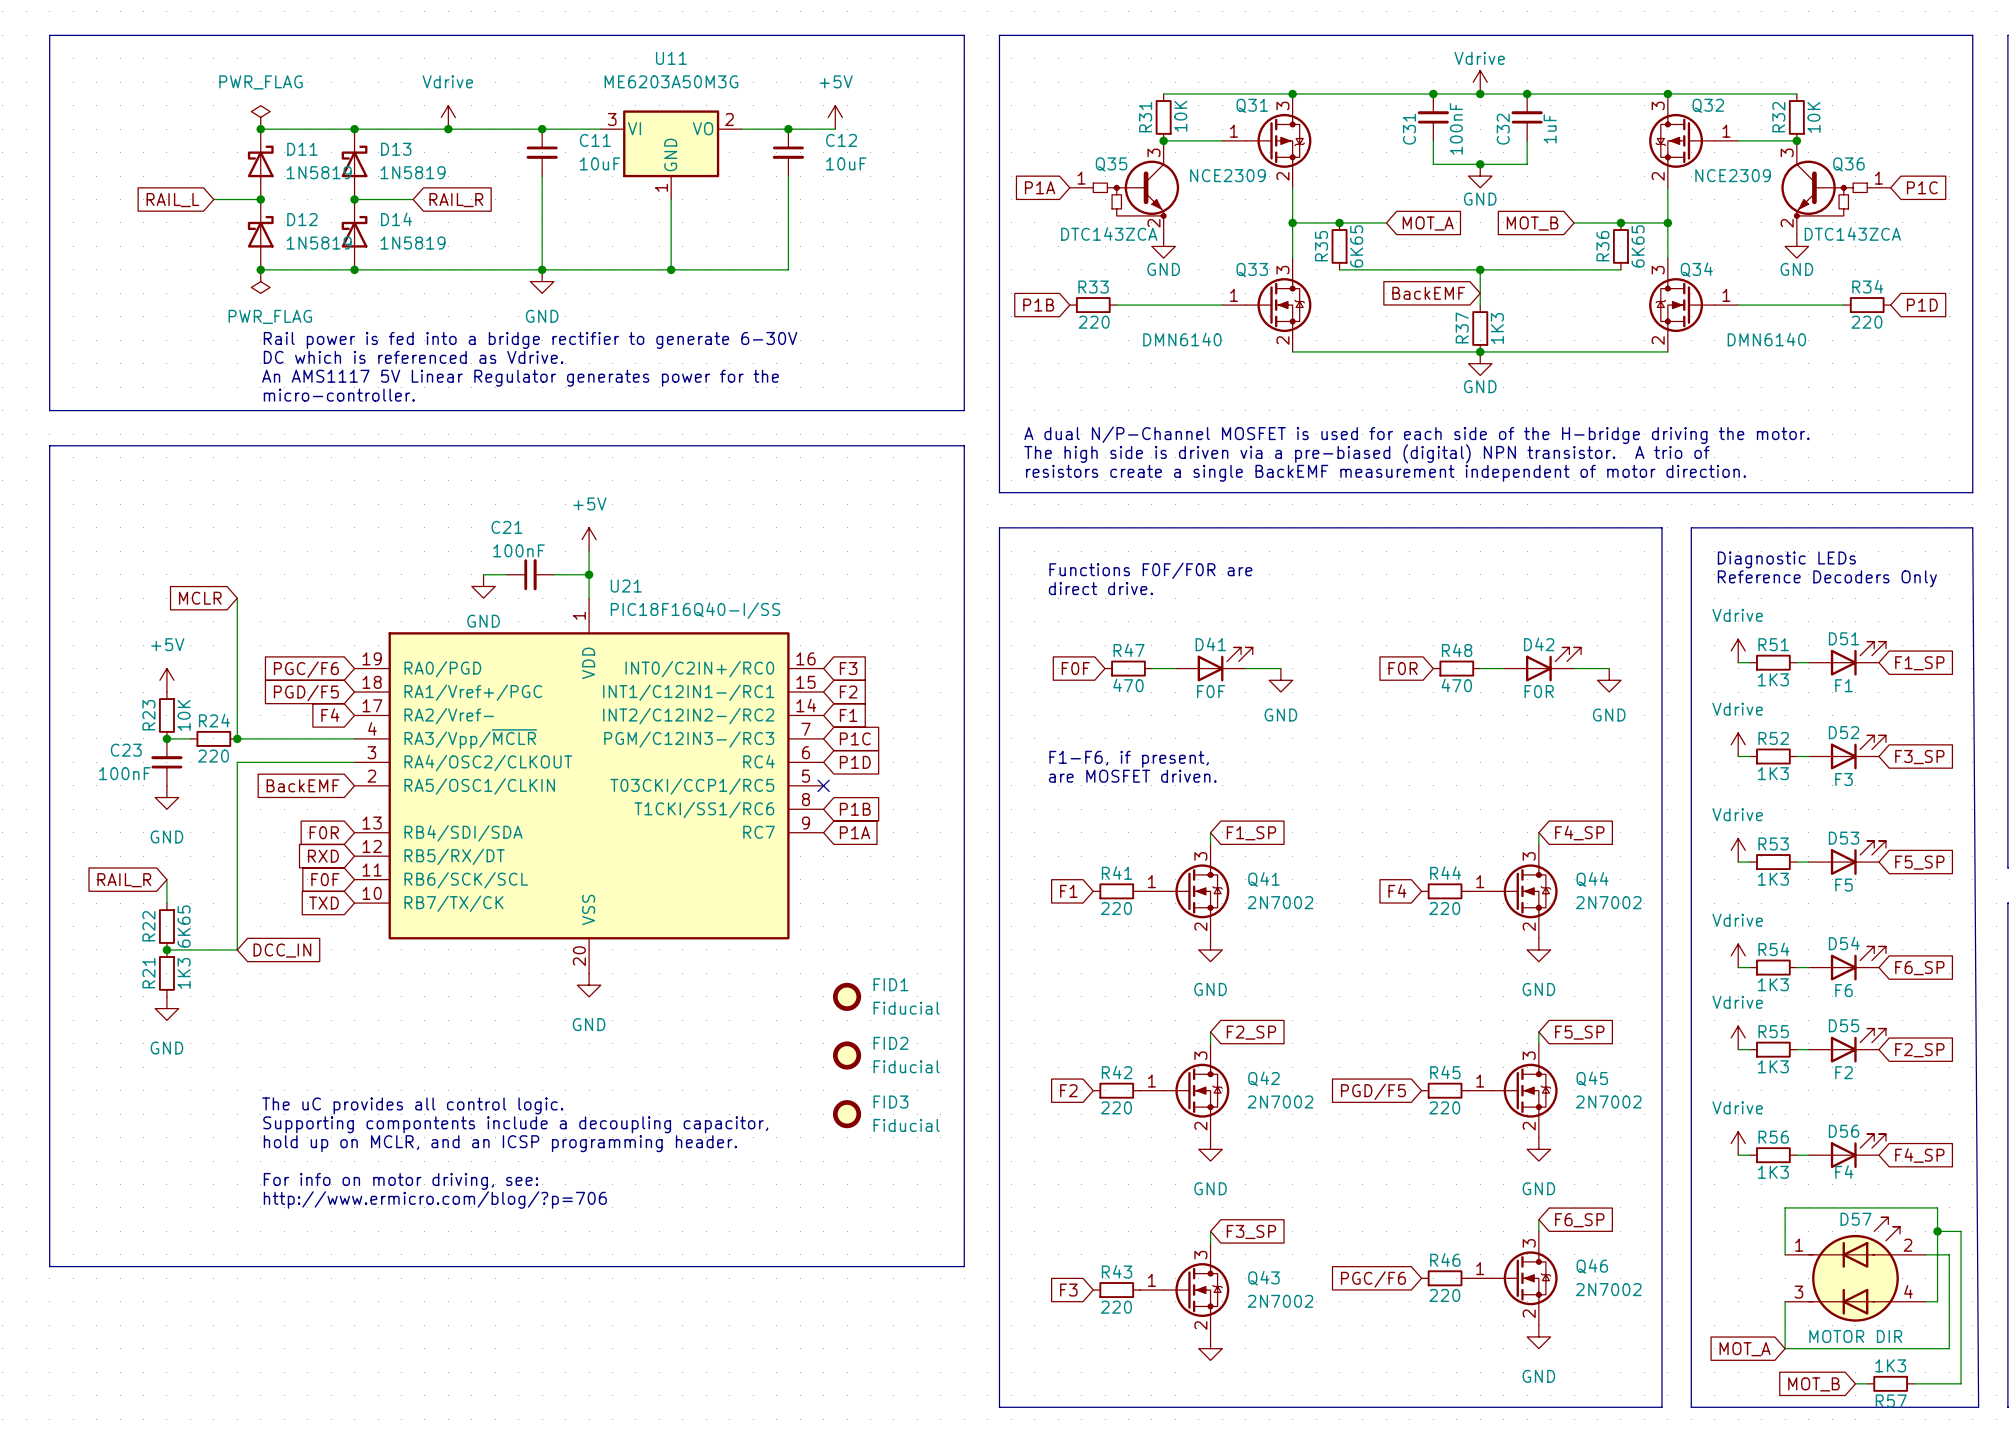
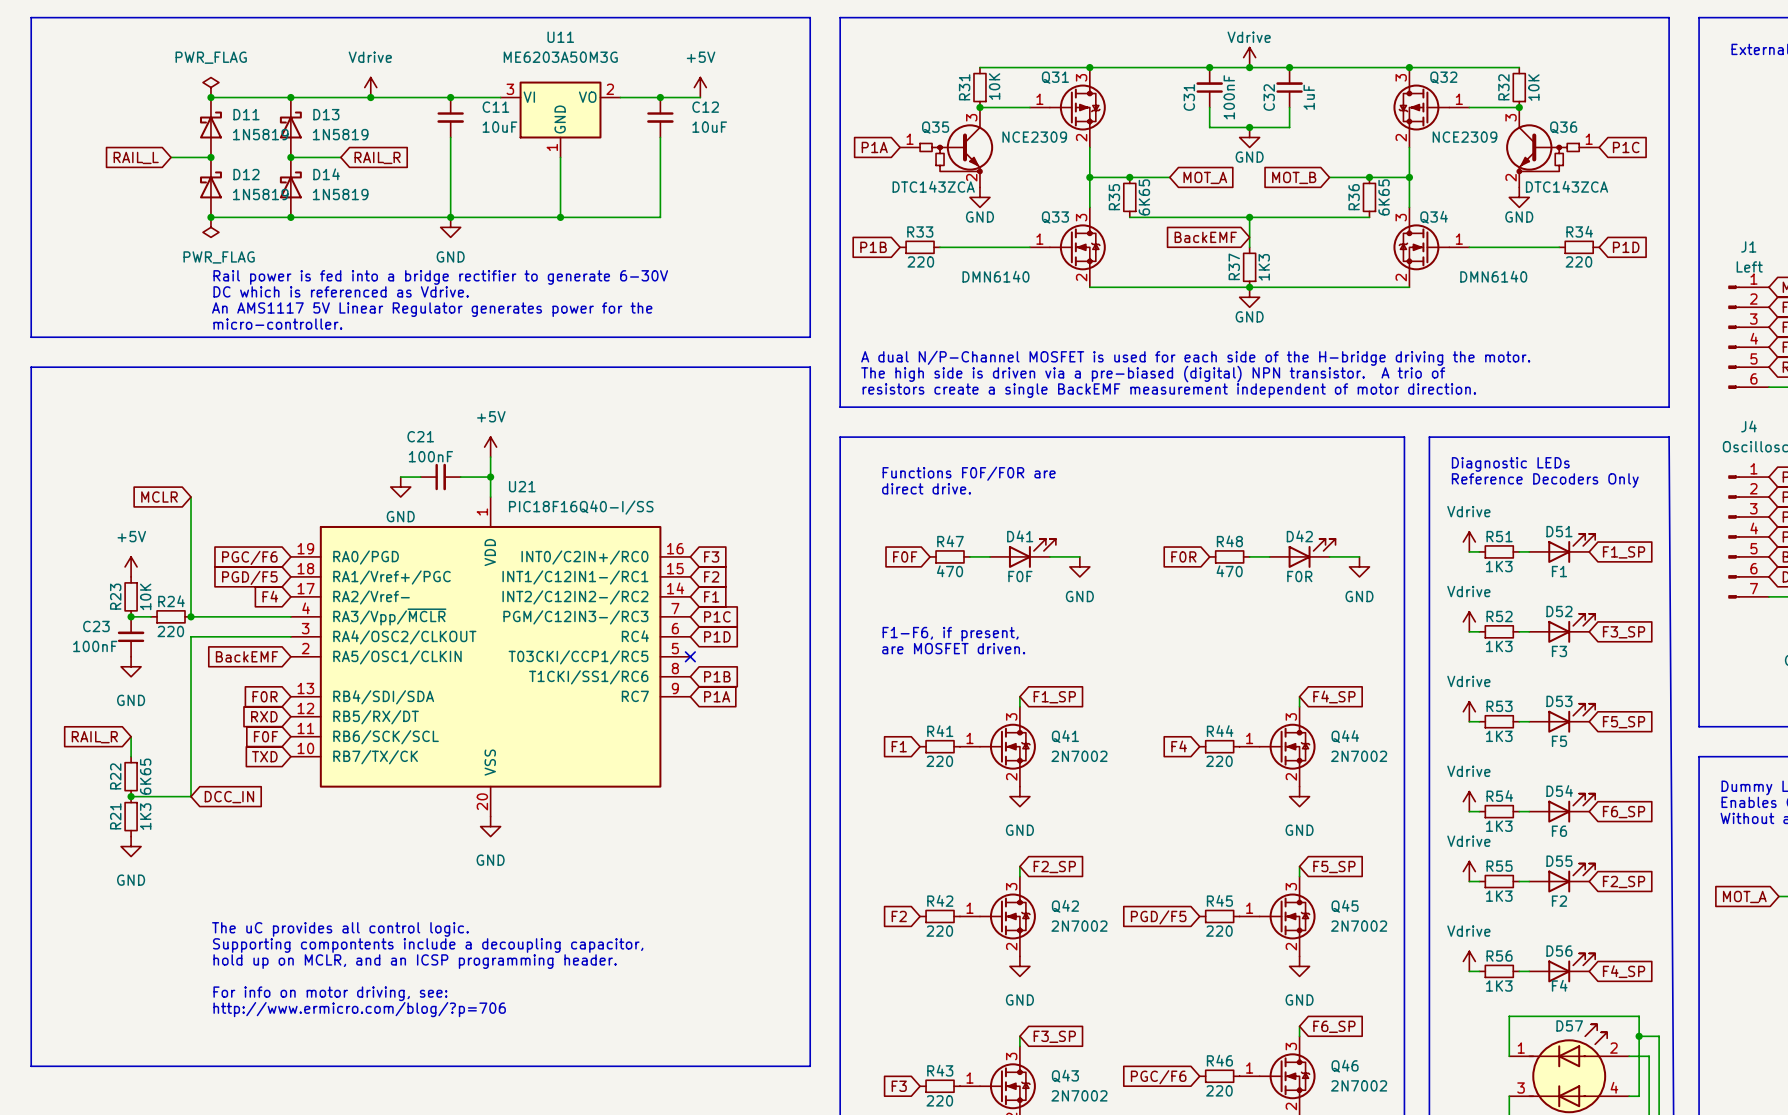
FID1: Fiducial (847, 996) -> none
FID2: Fiducial (847, 1055) -> none
FID3: Fiducial (847, 1114) -> none

